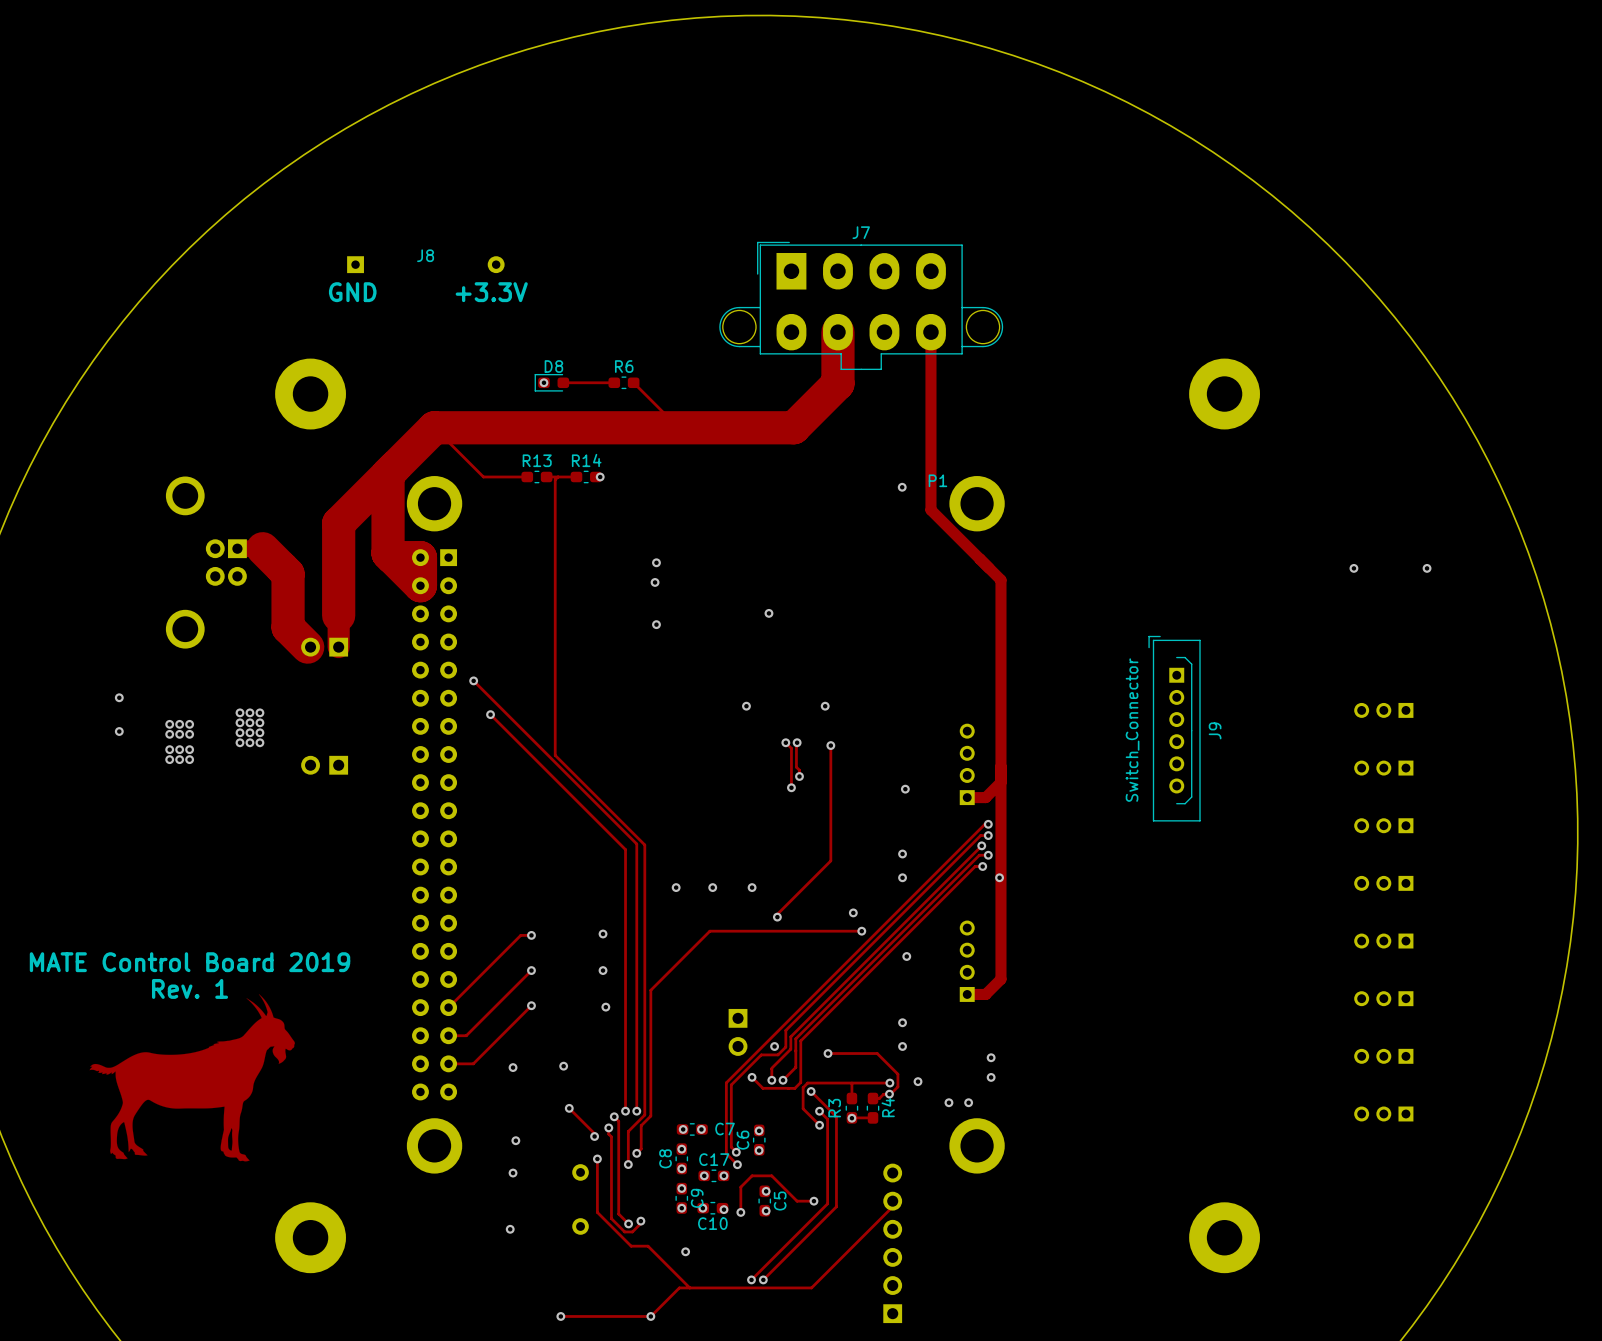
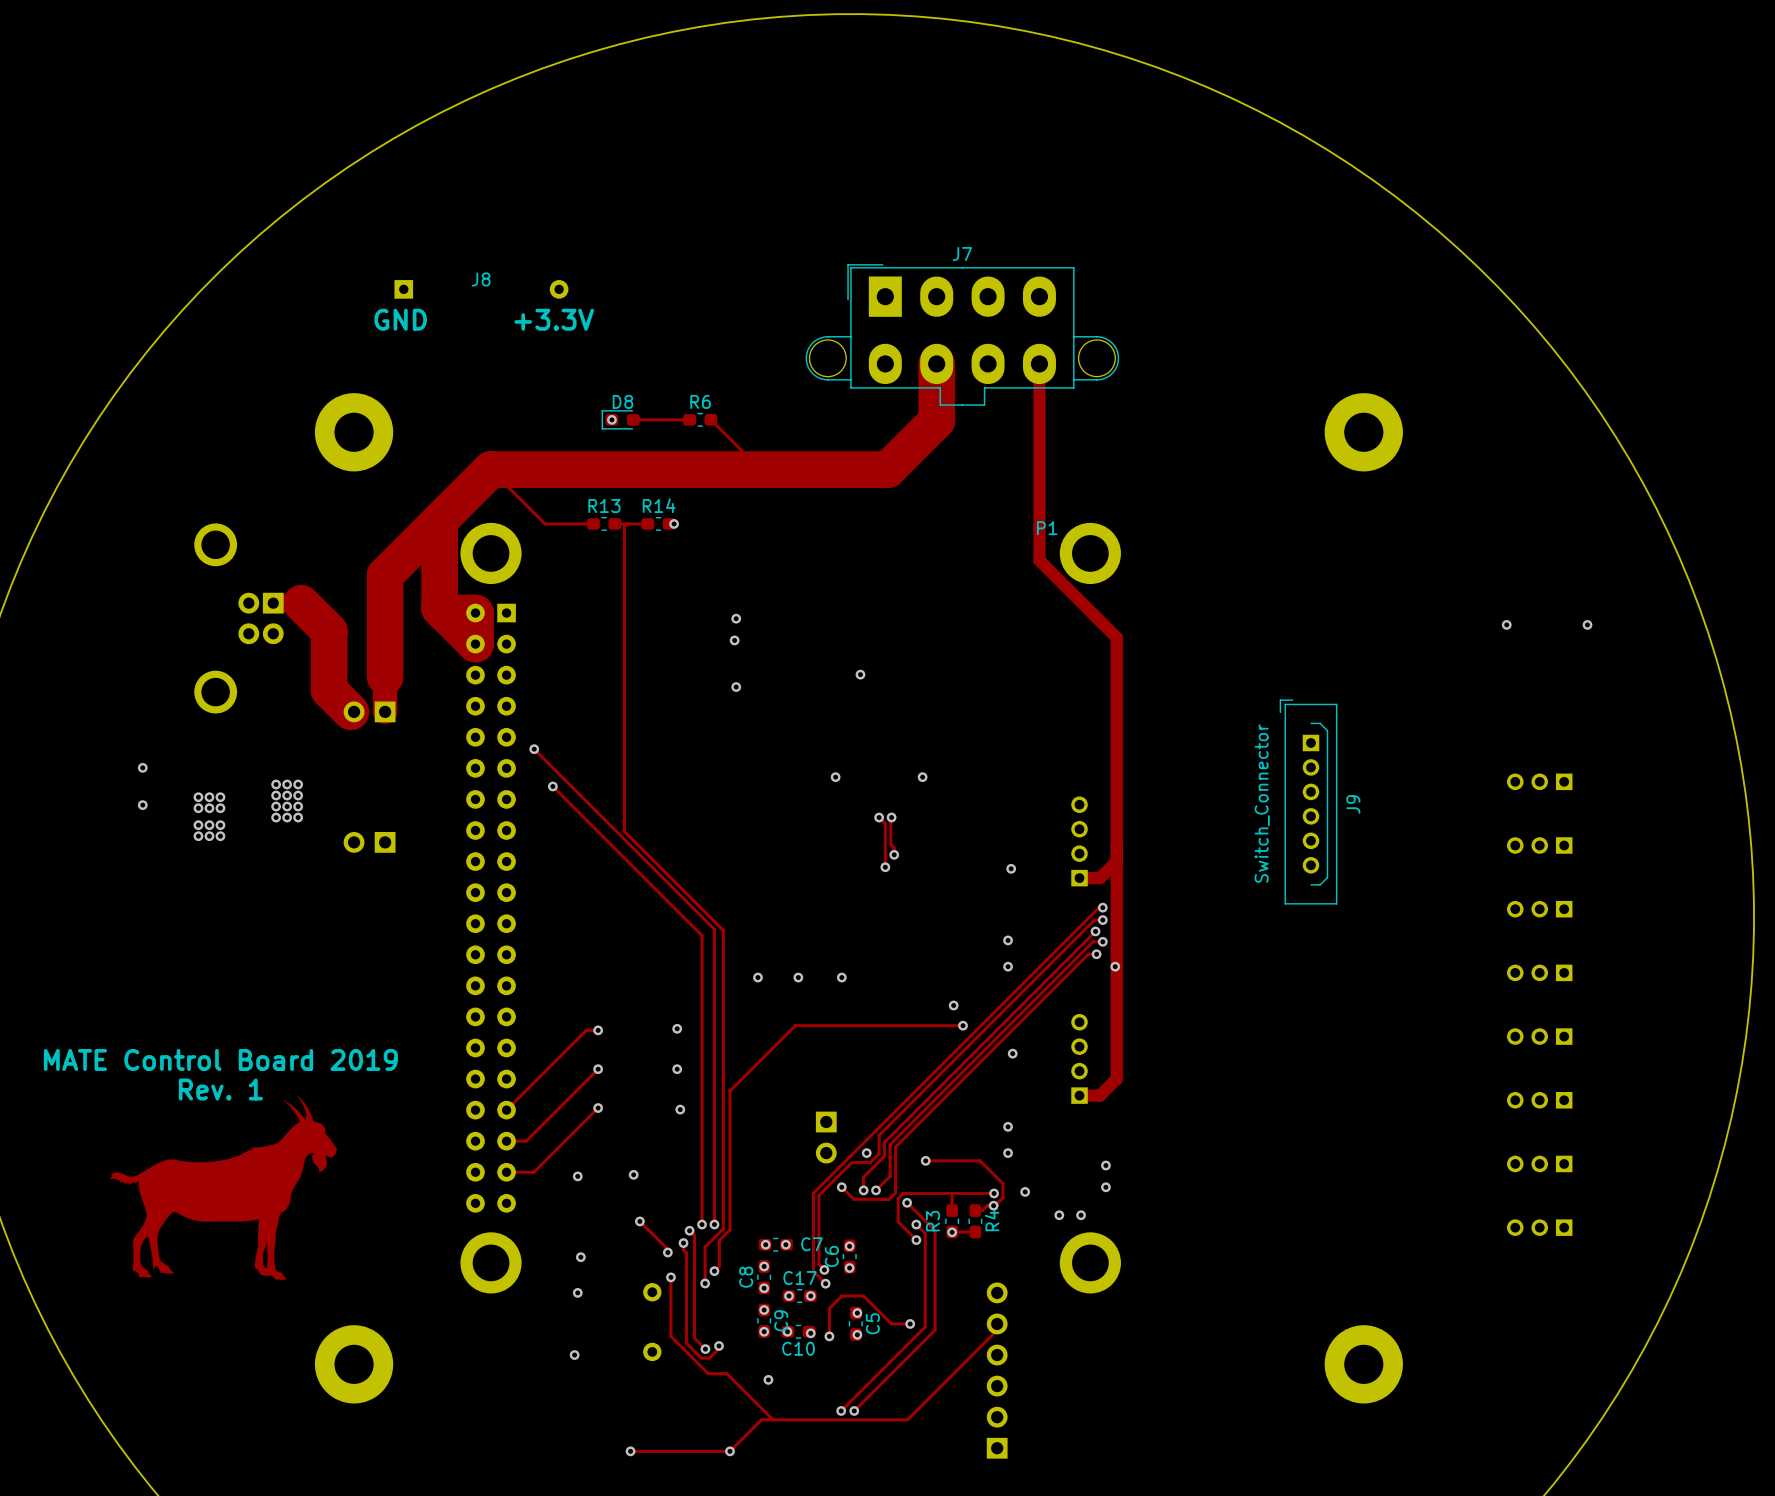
via: (902, 487) -> none
track: (830, 745) (830, 860) (777, 914) (777, 917) -> none
via: (830, 745) -> none
via: (777, 917) -> none

